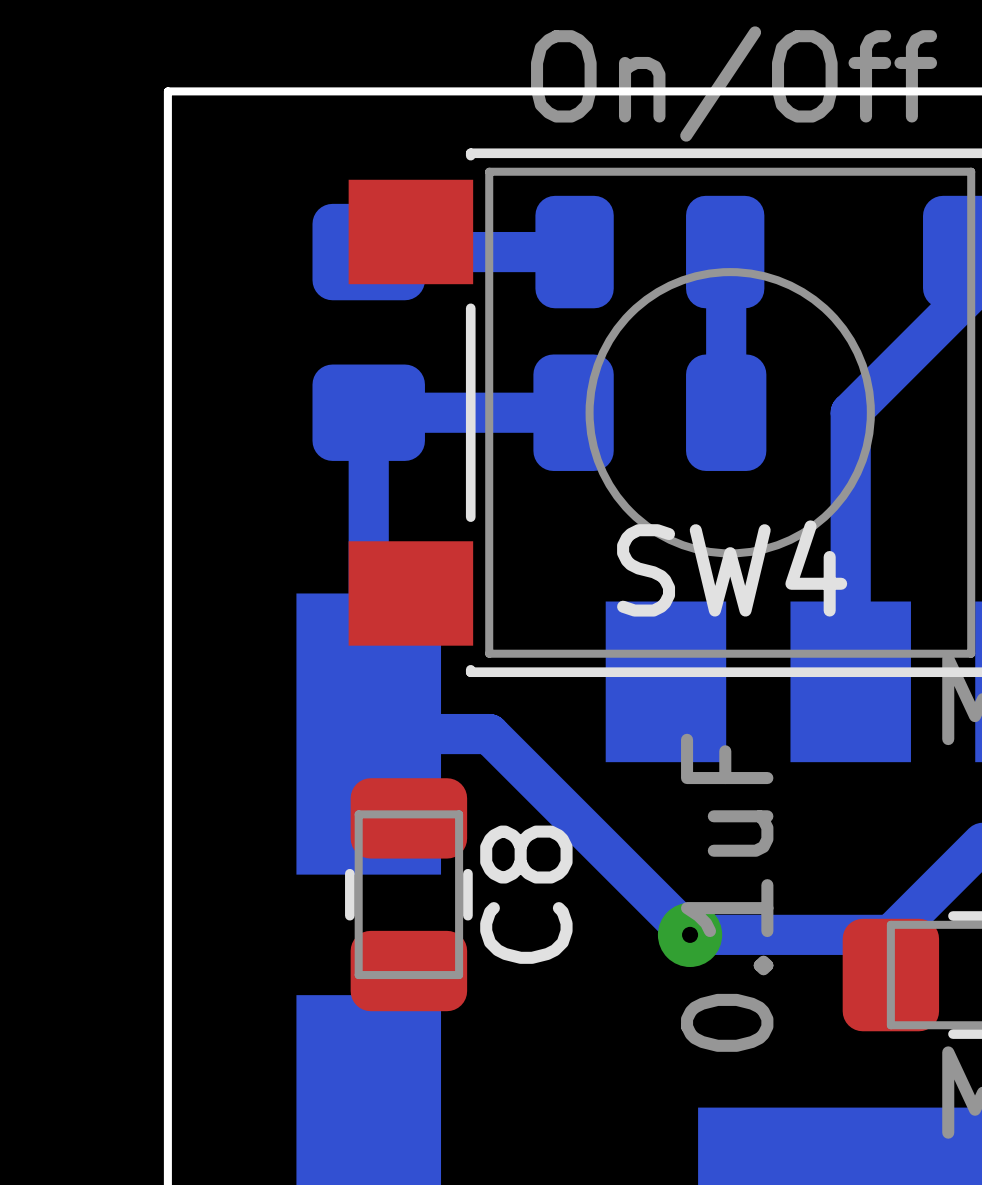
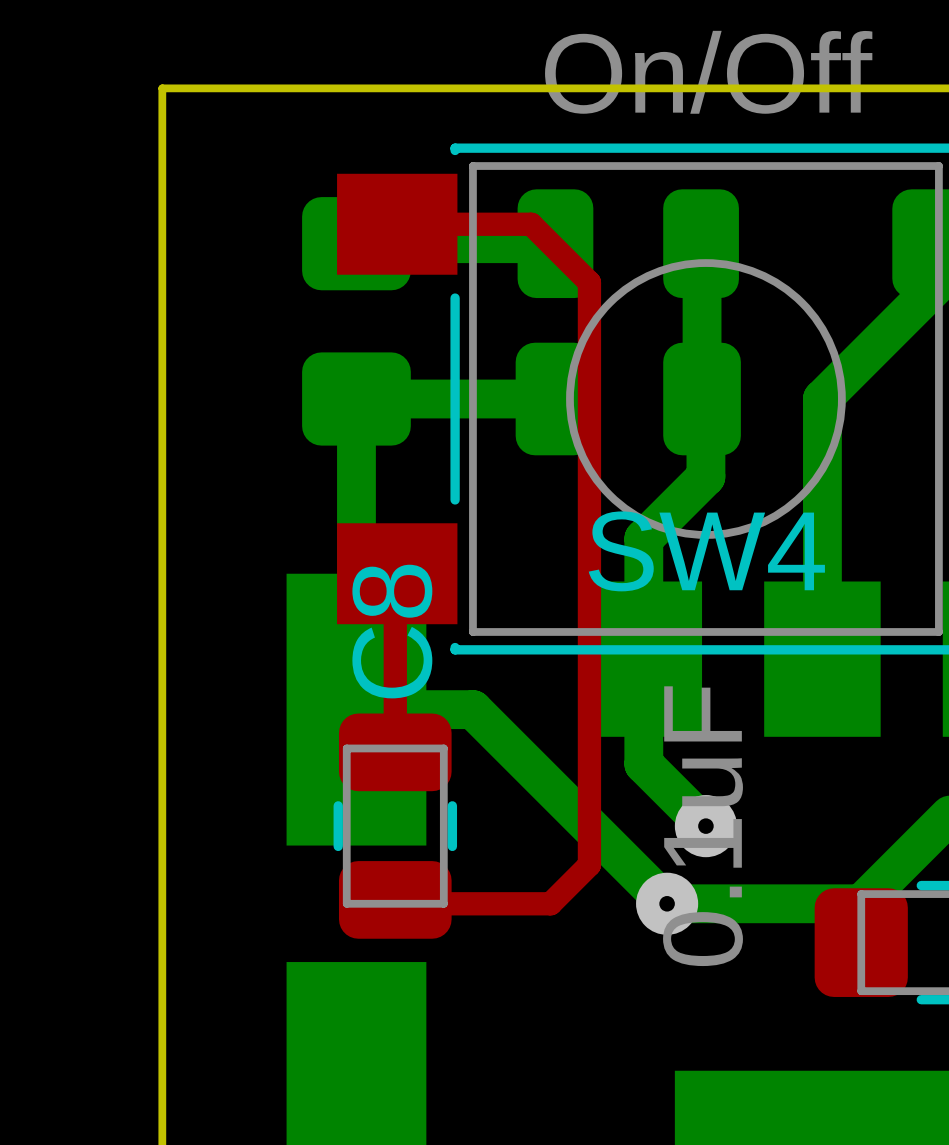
top track: none -> (397, 224) (531, 224) (589, 282) (589, 864) (550, 903) (399, 903) (395, 899)
bottom track: none -> (702, 399) (705, 402) (705, 476) (643, 538) (643, 764) (705, 826)
top track: none -> (397, 573) (395, 575) (395, 752)
via: none -> (705, 826)
C8 position: (408, 894) -> (395, 826)
C8 name position: C8 (526, 894) -> C8 (392, 631)

